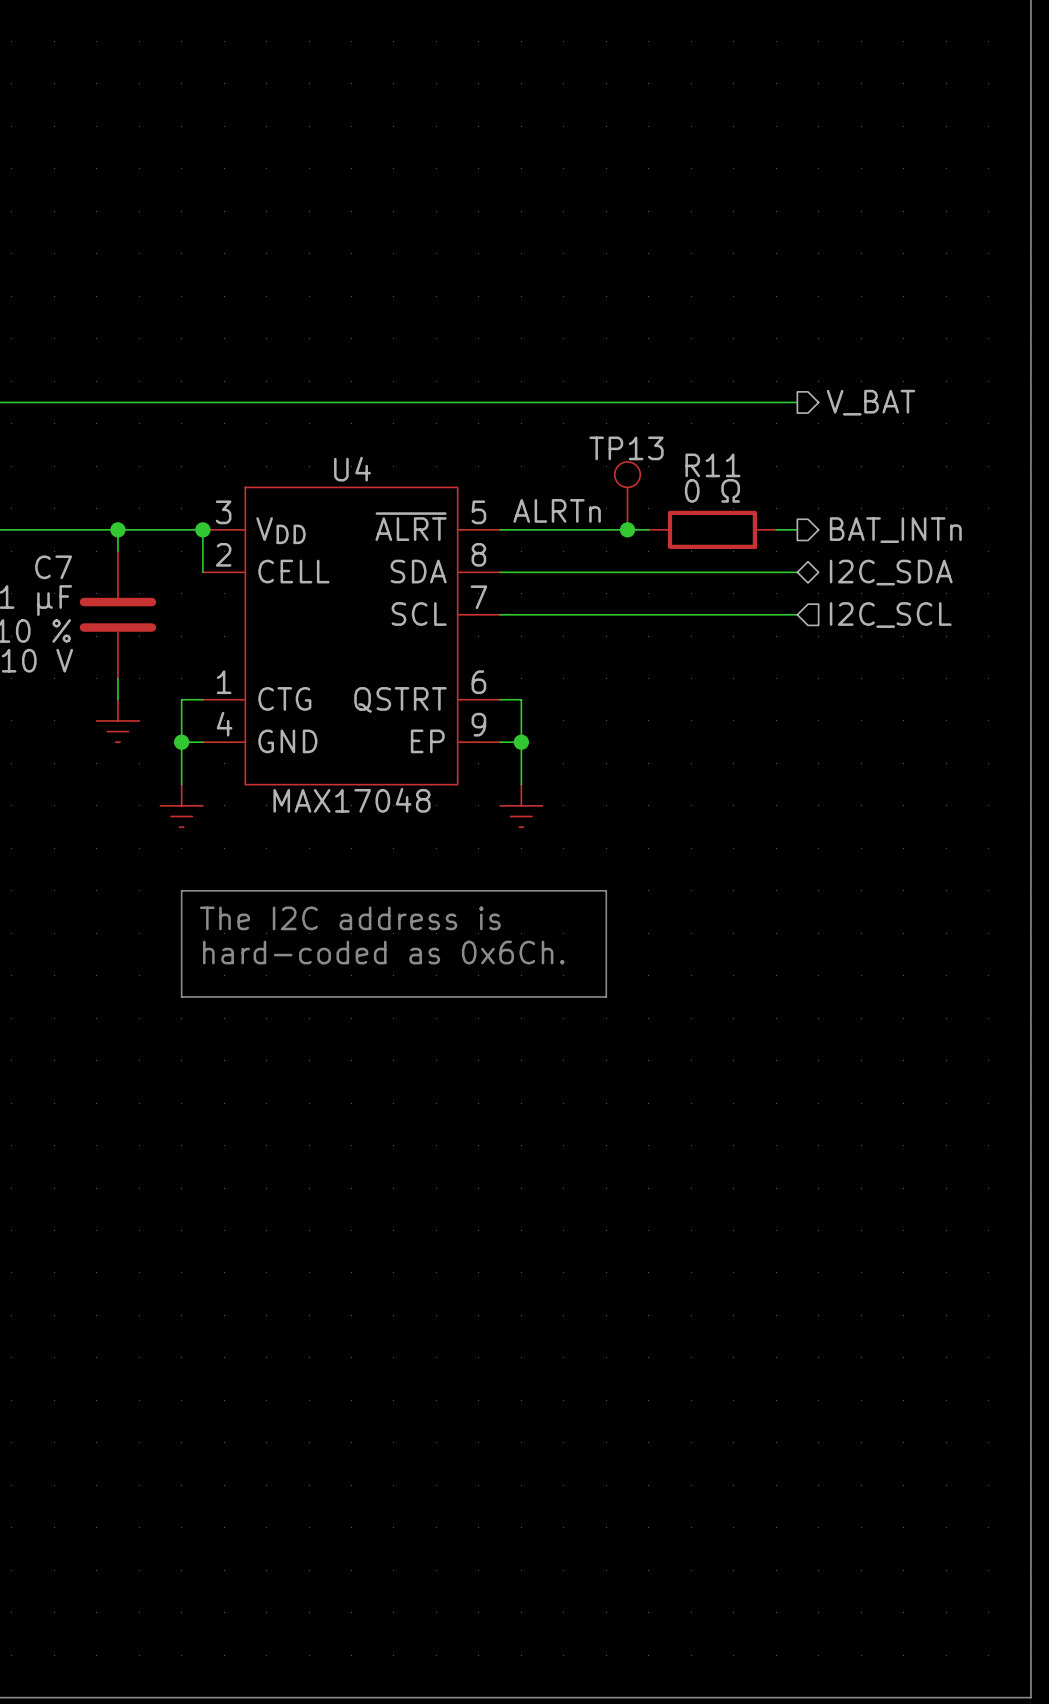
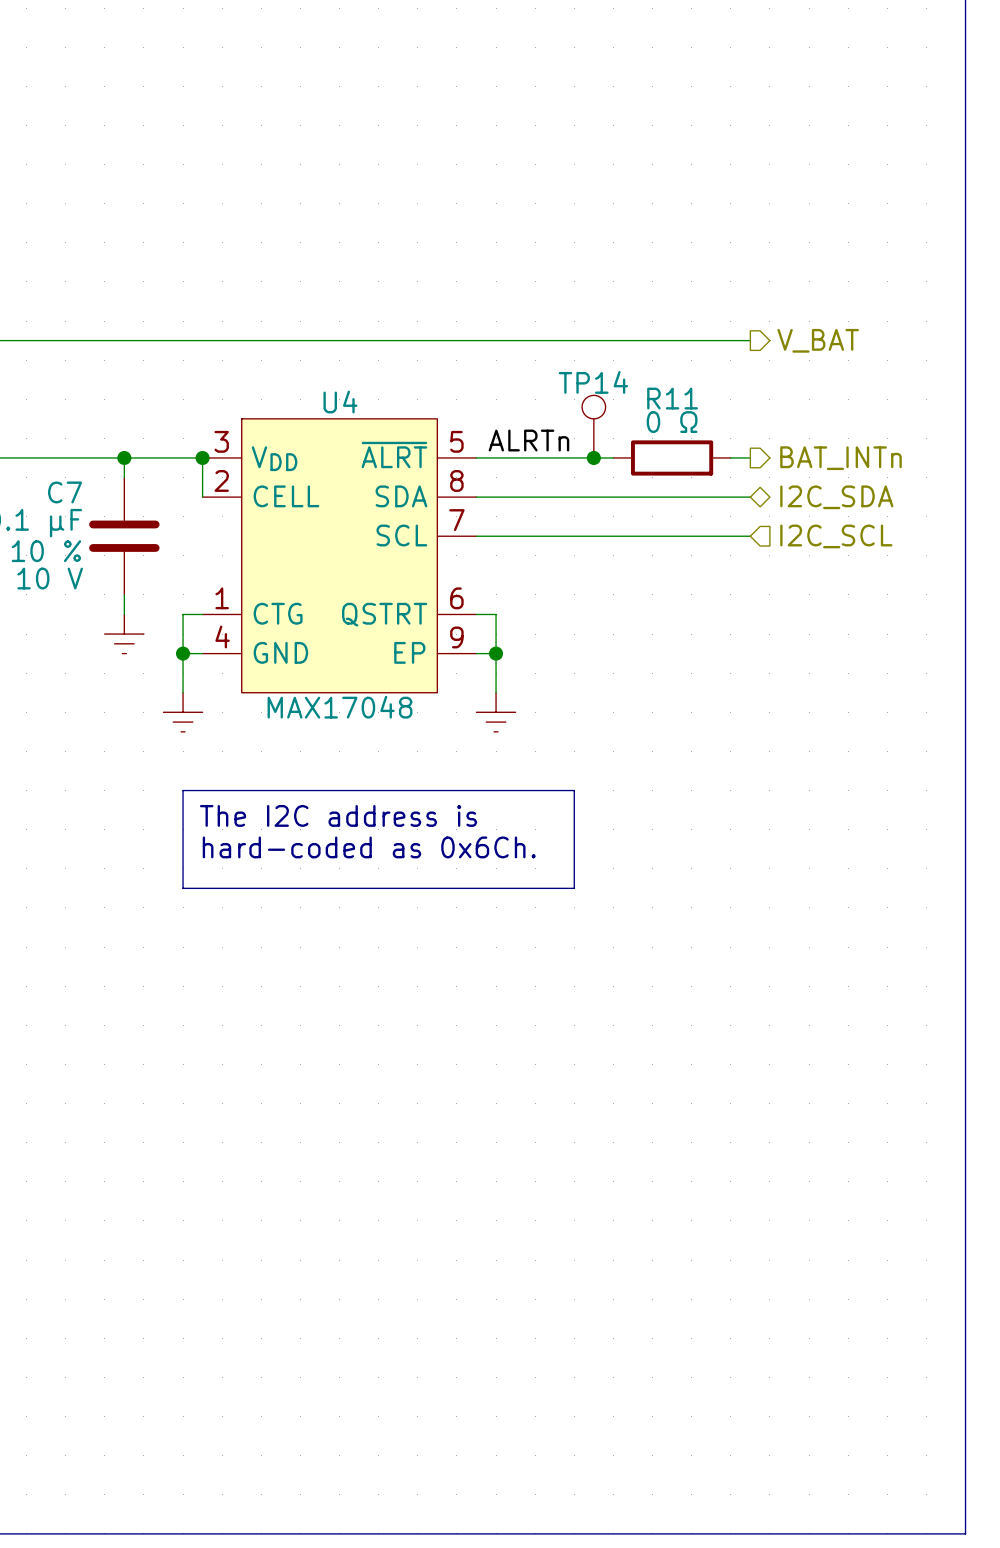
TP13 name: TP13 (626, 448) -> TP14 (593, 382)

